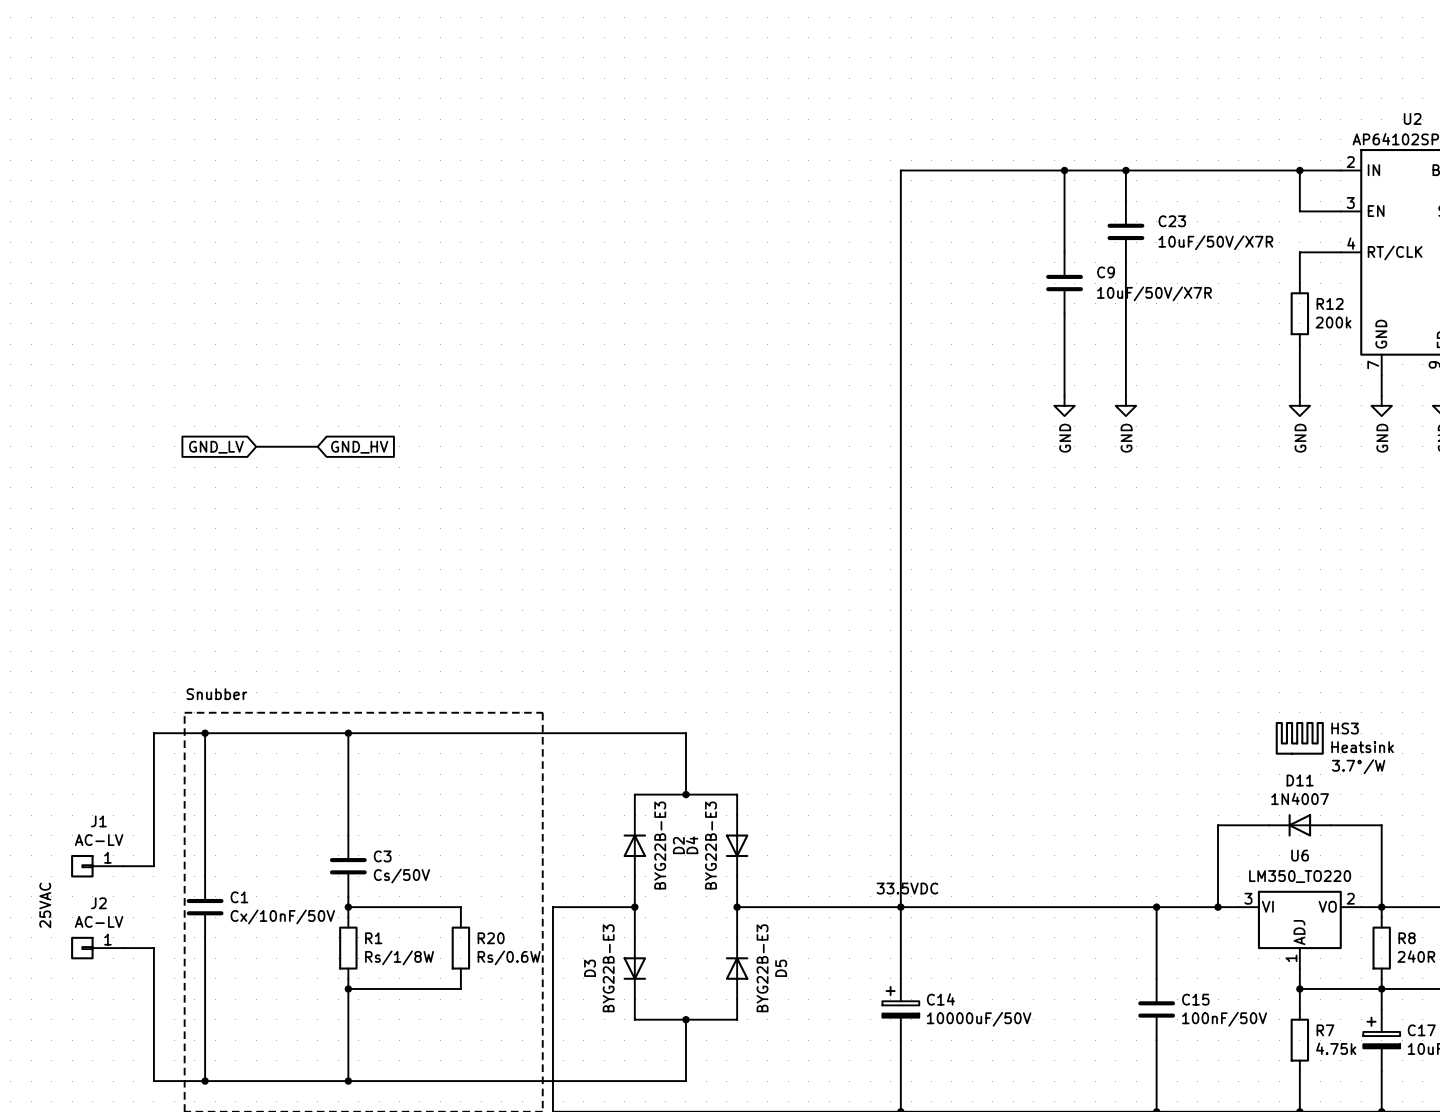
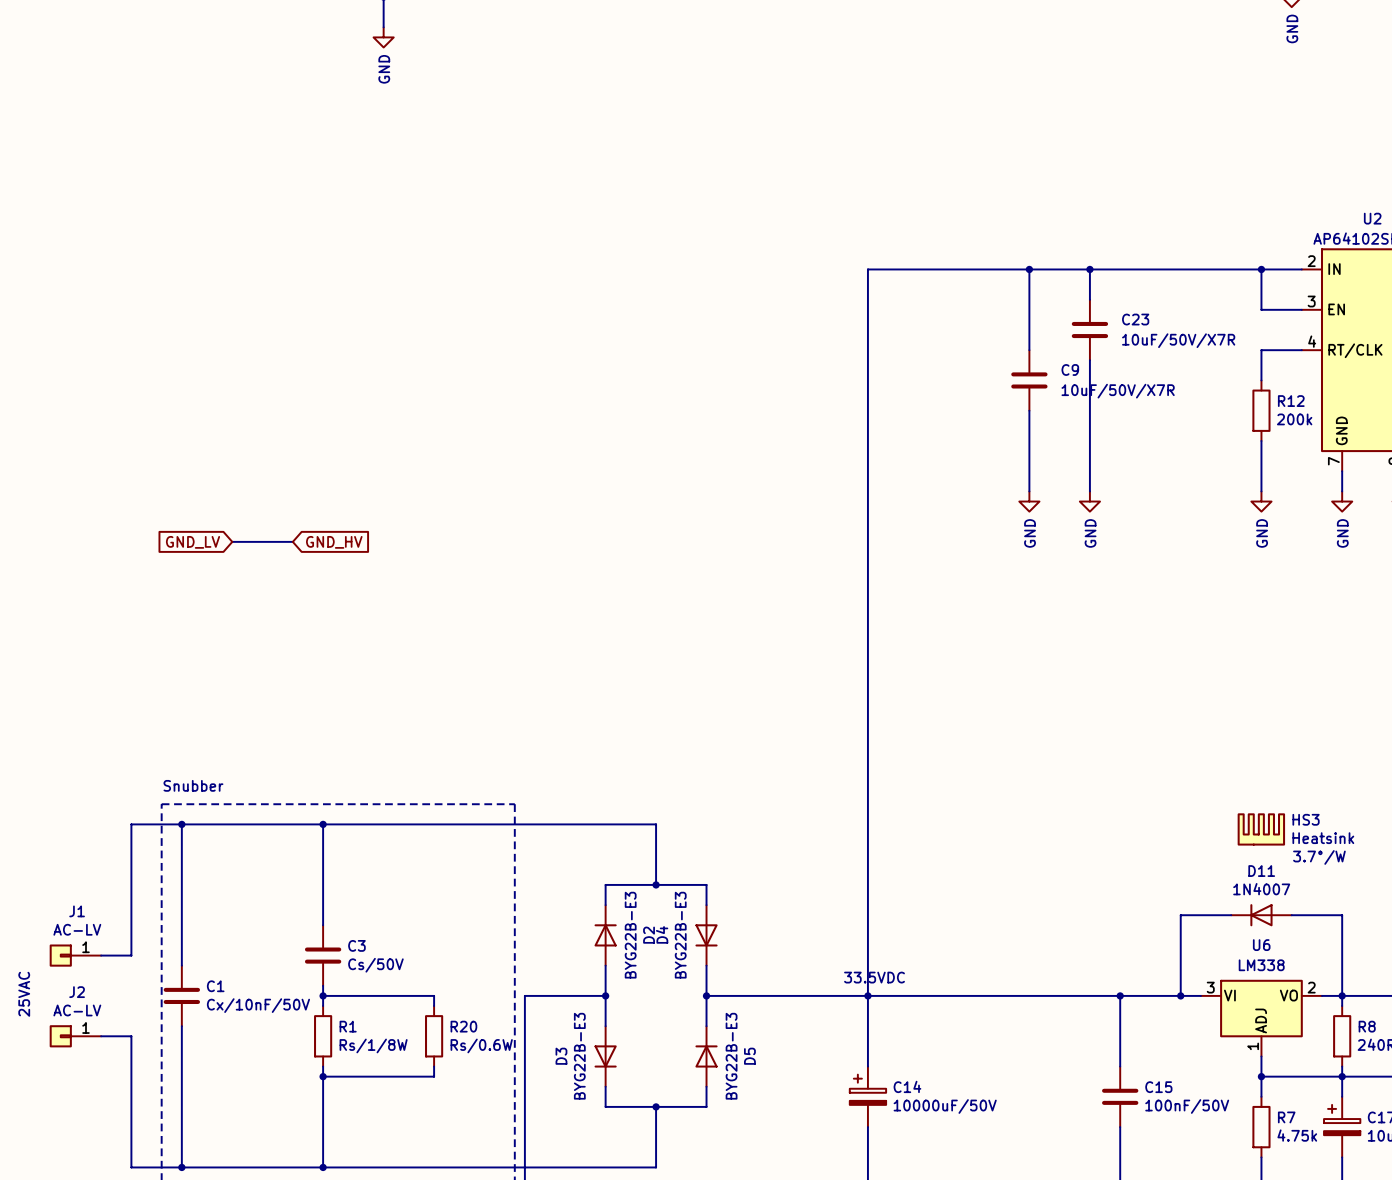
U6 value: LM350_TO220 (1300, 876) -> LM338 (1261, 965)

